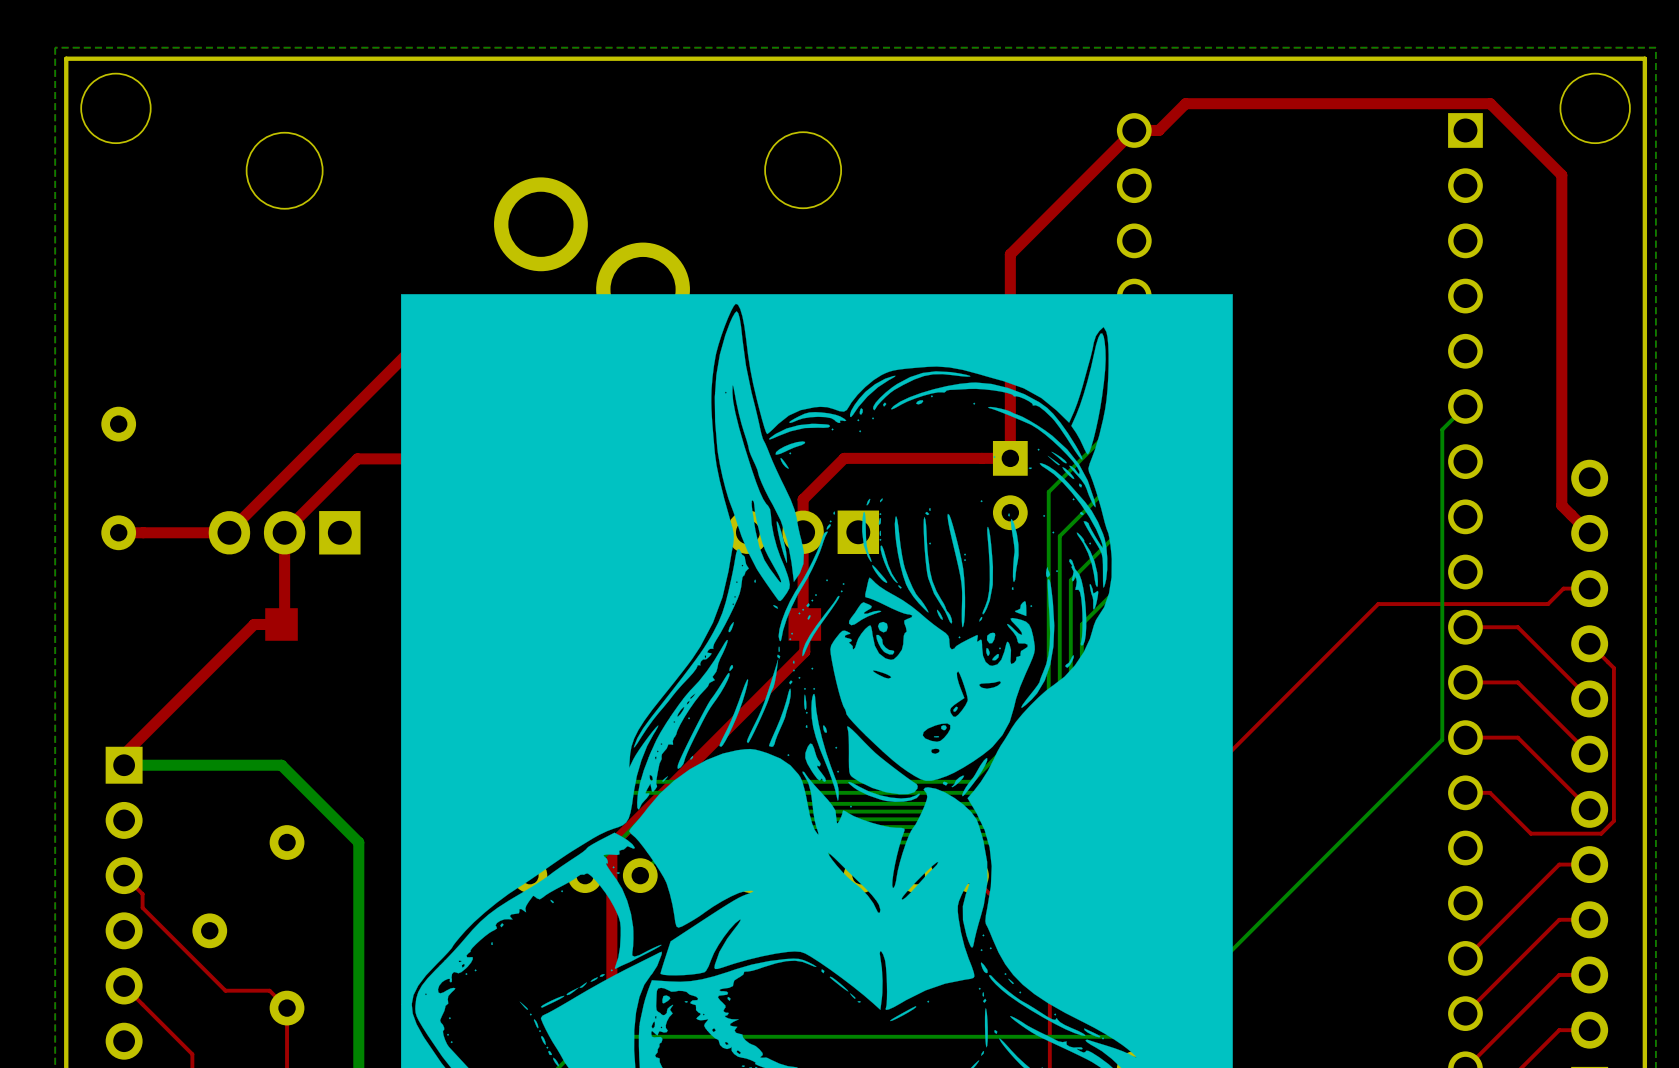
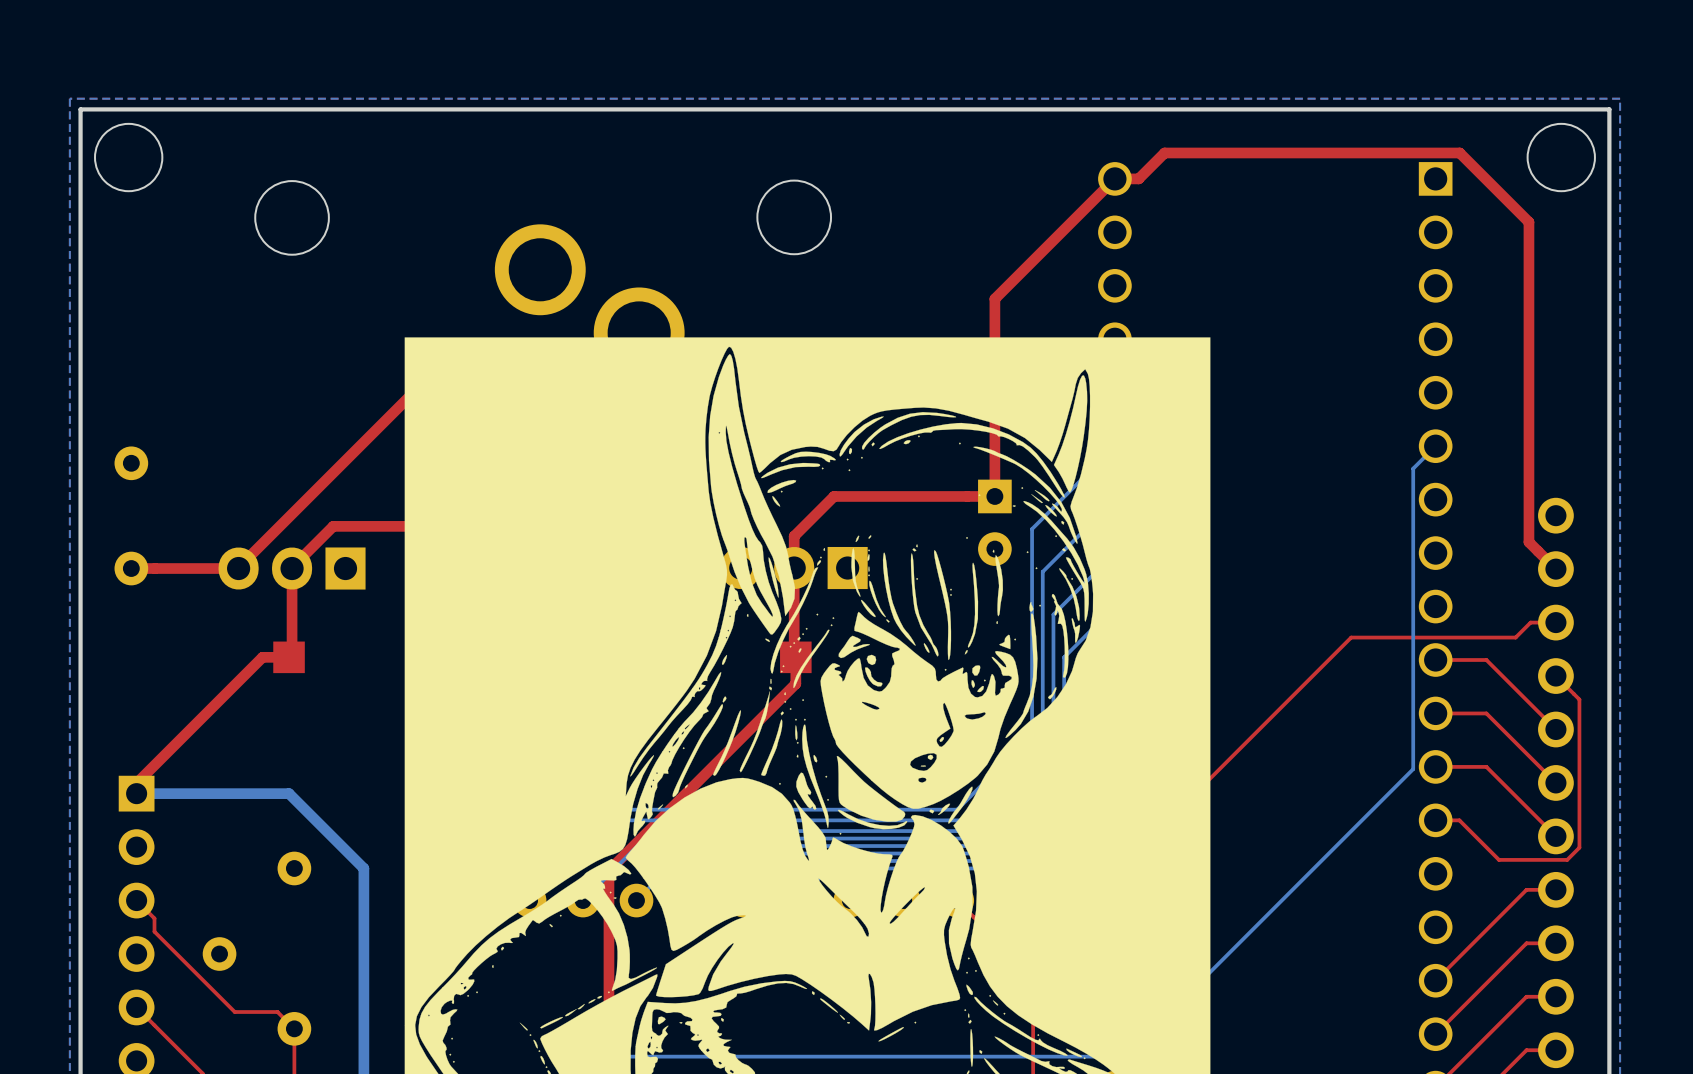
top track: (491, 458) (357, 458) (327, 489) -> (454, 526) (333, 526)

